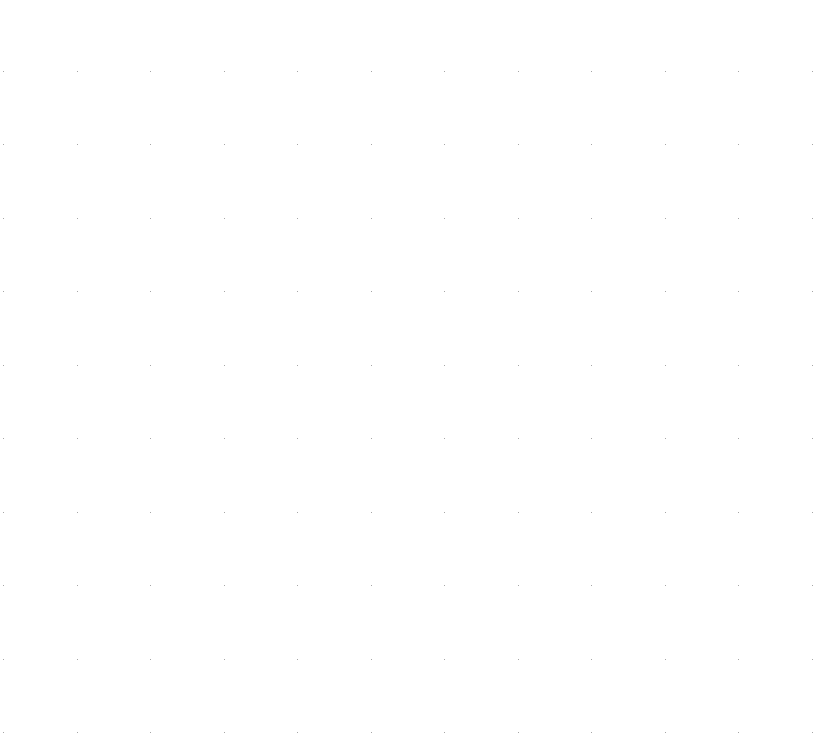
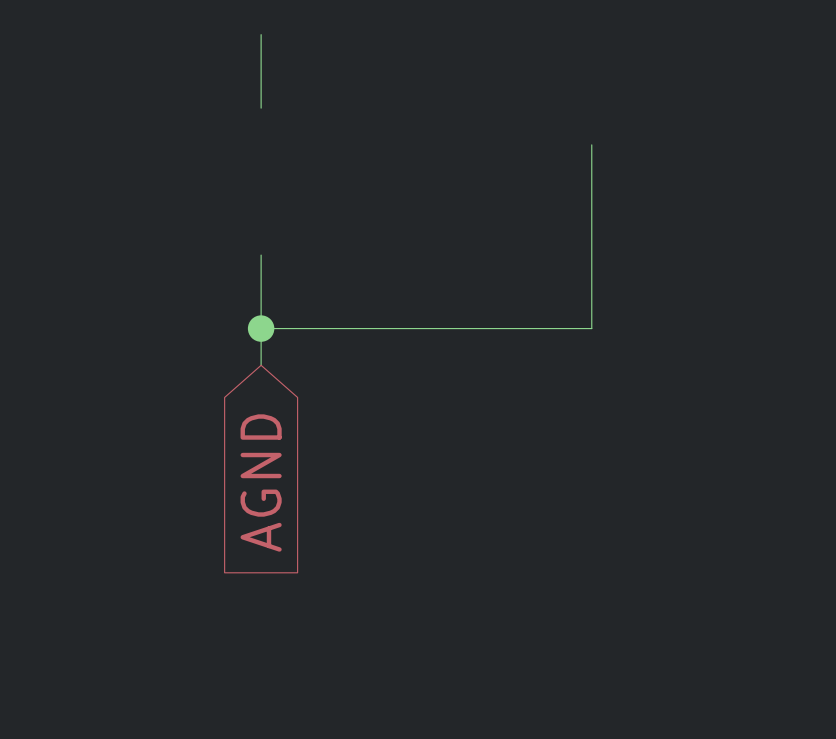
wire: none -> (261, 34) (261, 108)
wire: none -> (591, 144) (591, 328) (261, 328)
wire: none -> (261, 255) (261, 365)
junction: none -> (261, 328)
global label: none -> AGND (261, 483)

